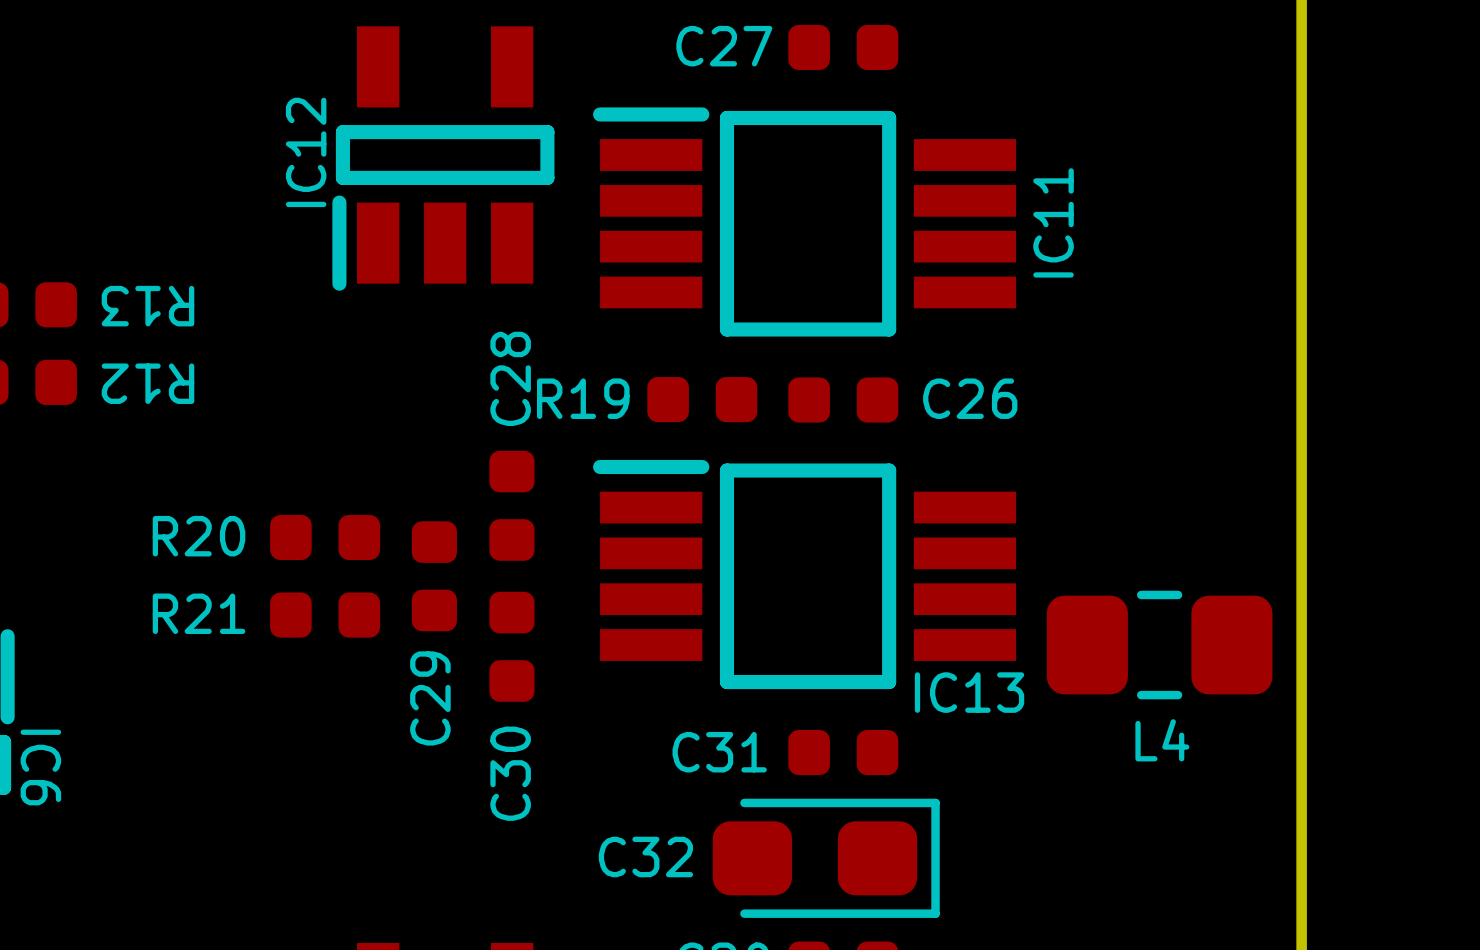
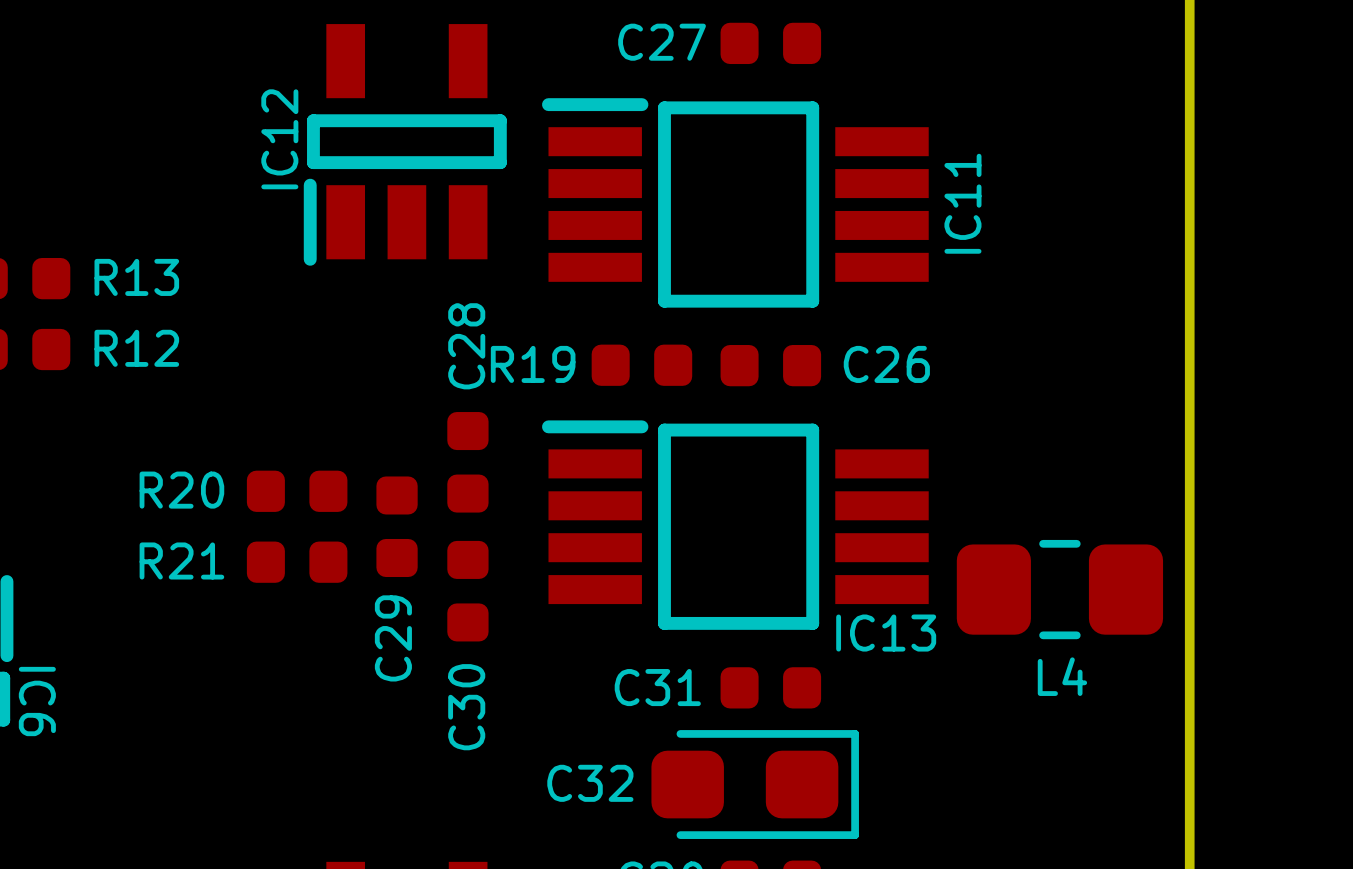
R13 name rotation: 0° (147, 306) -> 180° (136, 277)
R12 name rotation: 0° (147, 383) -> 180° (136, 348)

